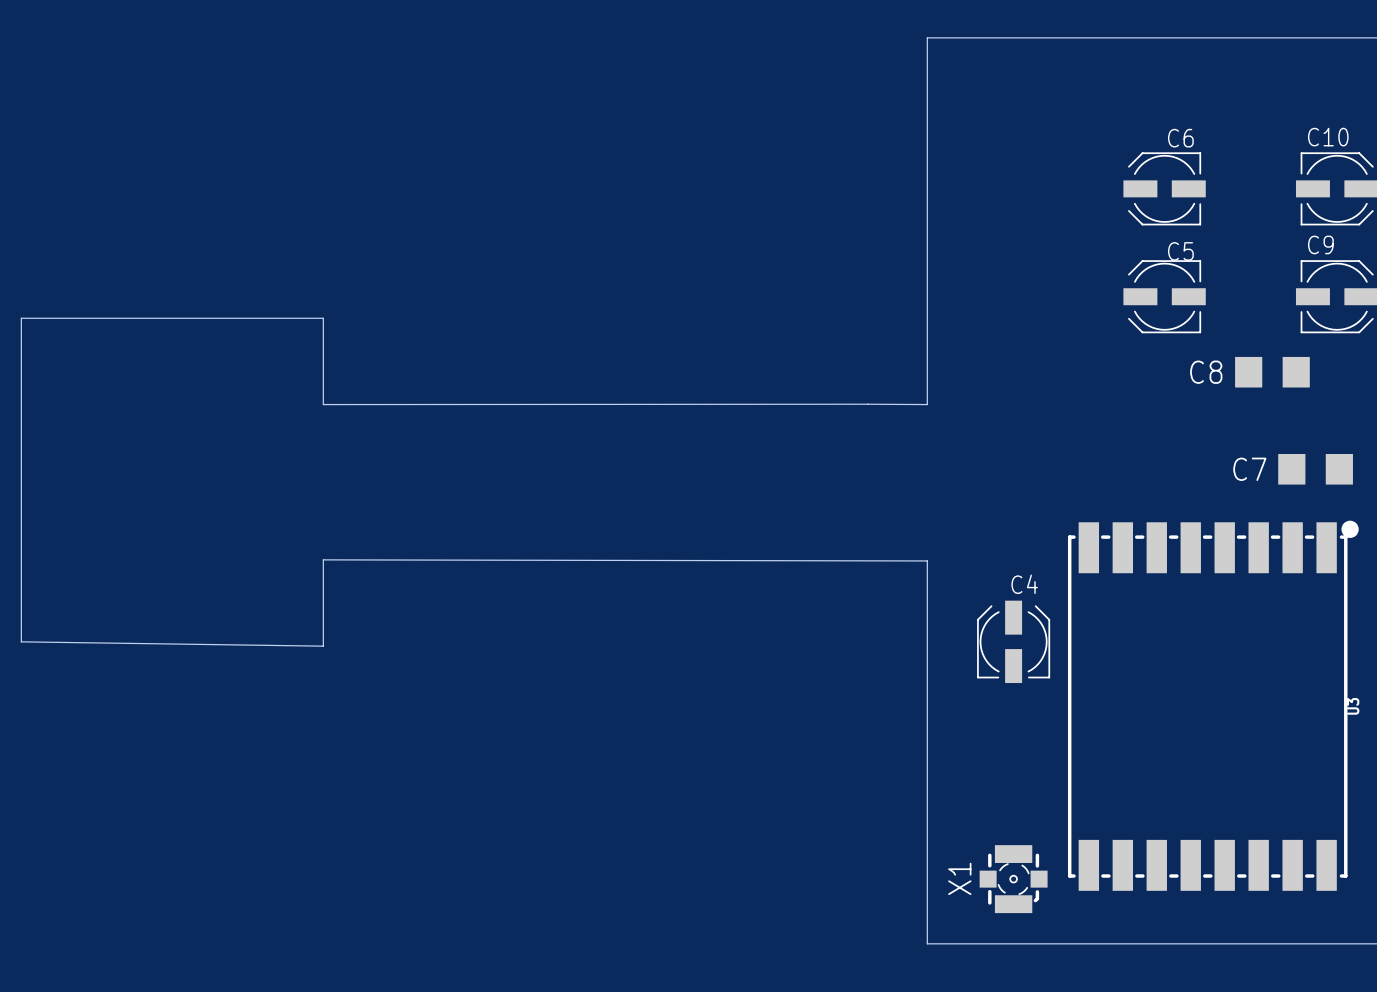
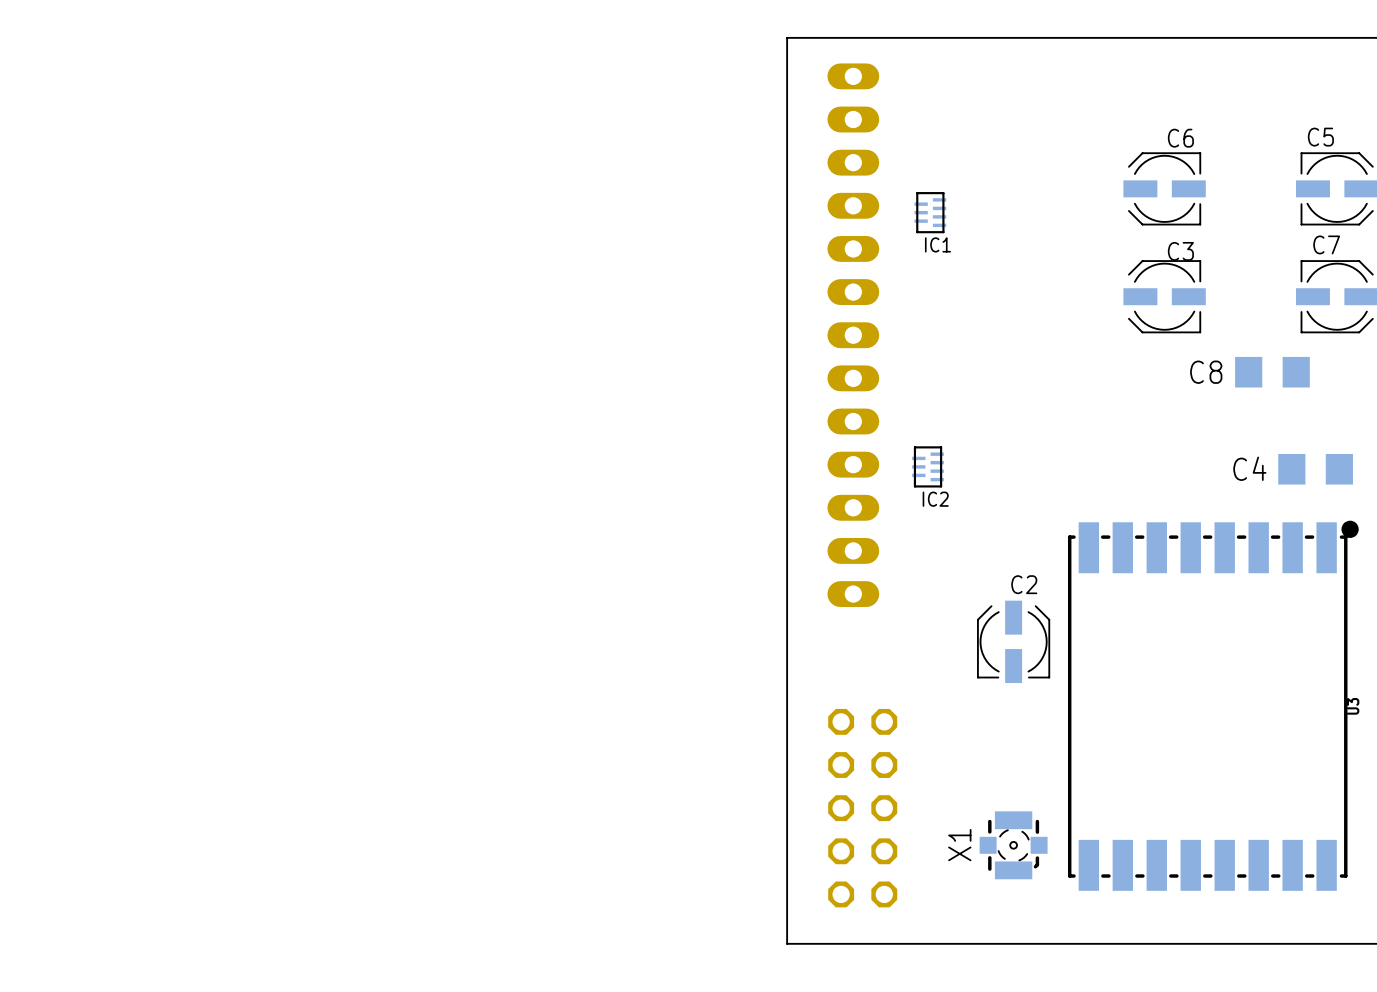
board edge: (927, 37) (927, 404) (323, 404) (323, 318) (21, 318) (21, 641) (323, 646) (323, 559) (927, 560) (927, 943) -> (927, 37) (787, 37) (787, 943) (927, 943)
C10 name: C10 (1328, 137) -> C5 (1320, 137)
IC1: none -> (930, 212)
C9 name: C9 (1320, 244) -> C7 (1326, 244)
C5 name: C5 (1180, 251) -> C3 (1180, 251)
part: none -> (853, 335)
IC2: none -> (928, 466)
C7 name: C7 (1249, 469) -> C4 (1249, 468)
C4 name: C4 (1024, 584) -> C2 (1024, 584)
part: none -> (862, 808)
X1 position: (1013, 879) -> (1013, 845)

